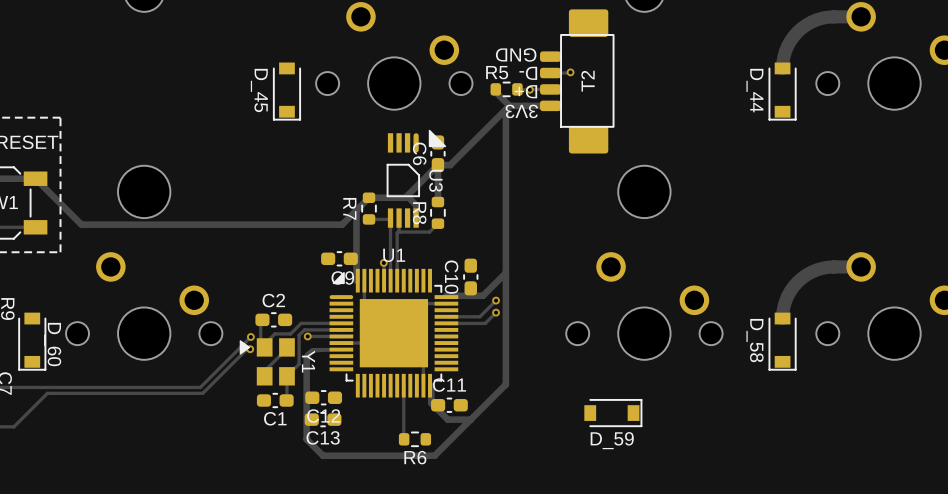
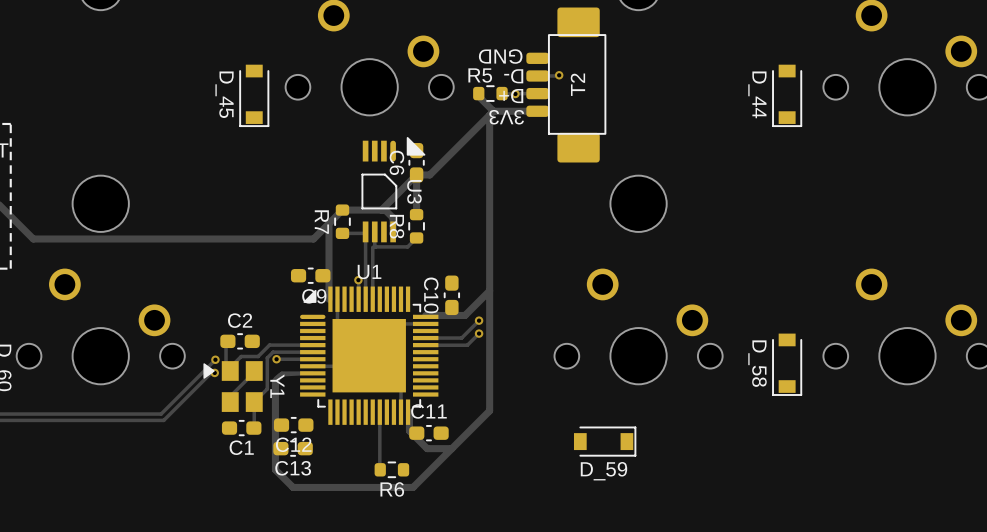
track: (861, 16) (828, 17) (806, 24) (797, 31) (787, 46) (782, 68) -> none
track: (861, 266) (828, 267) (806, 274) (793, 286) (787, 296) (782, 318) -> none

